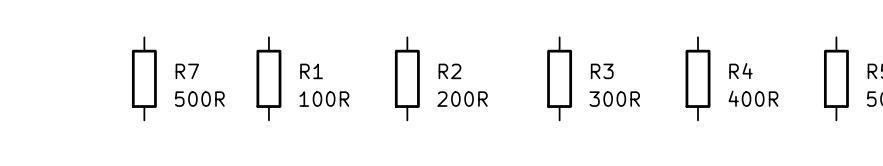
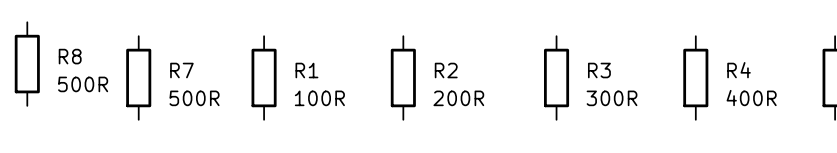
R8: none -> 500R (27, 64)

